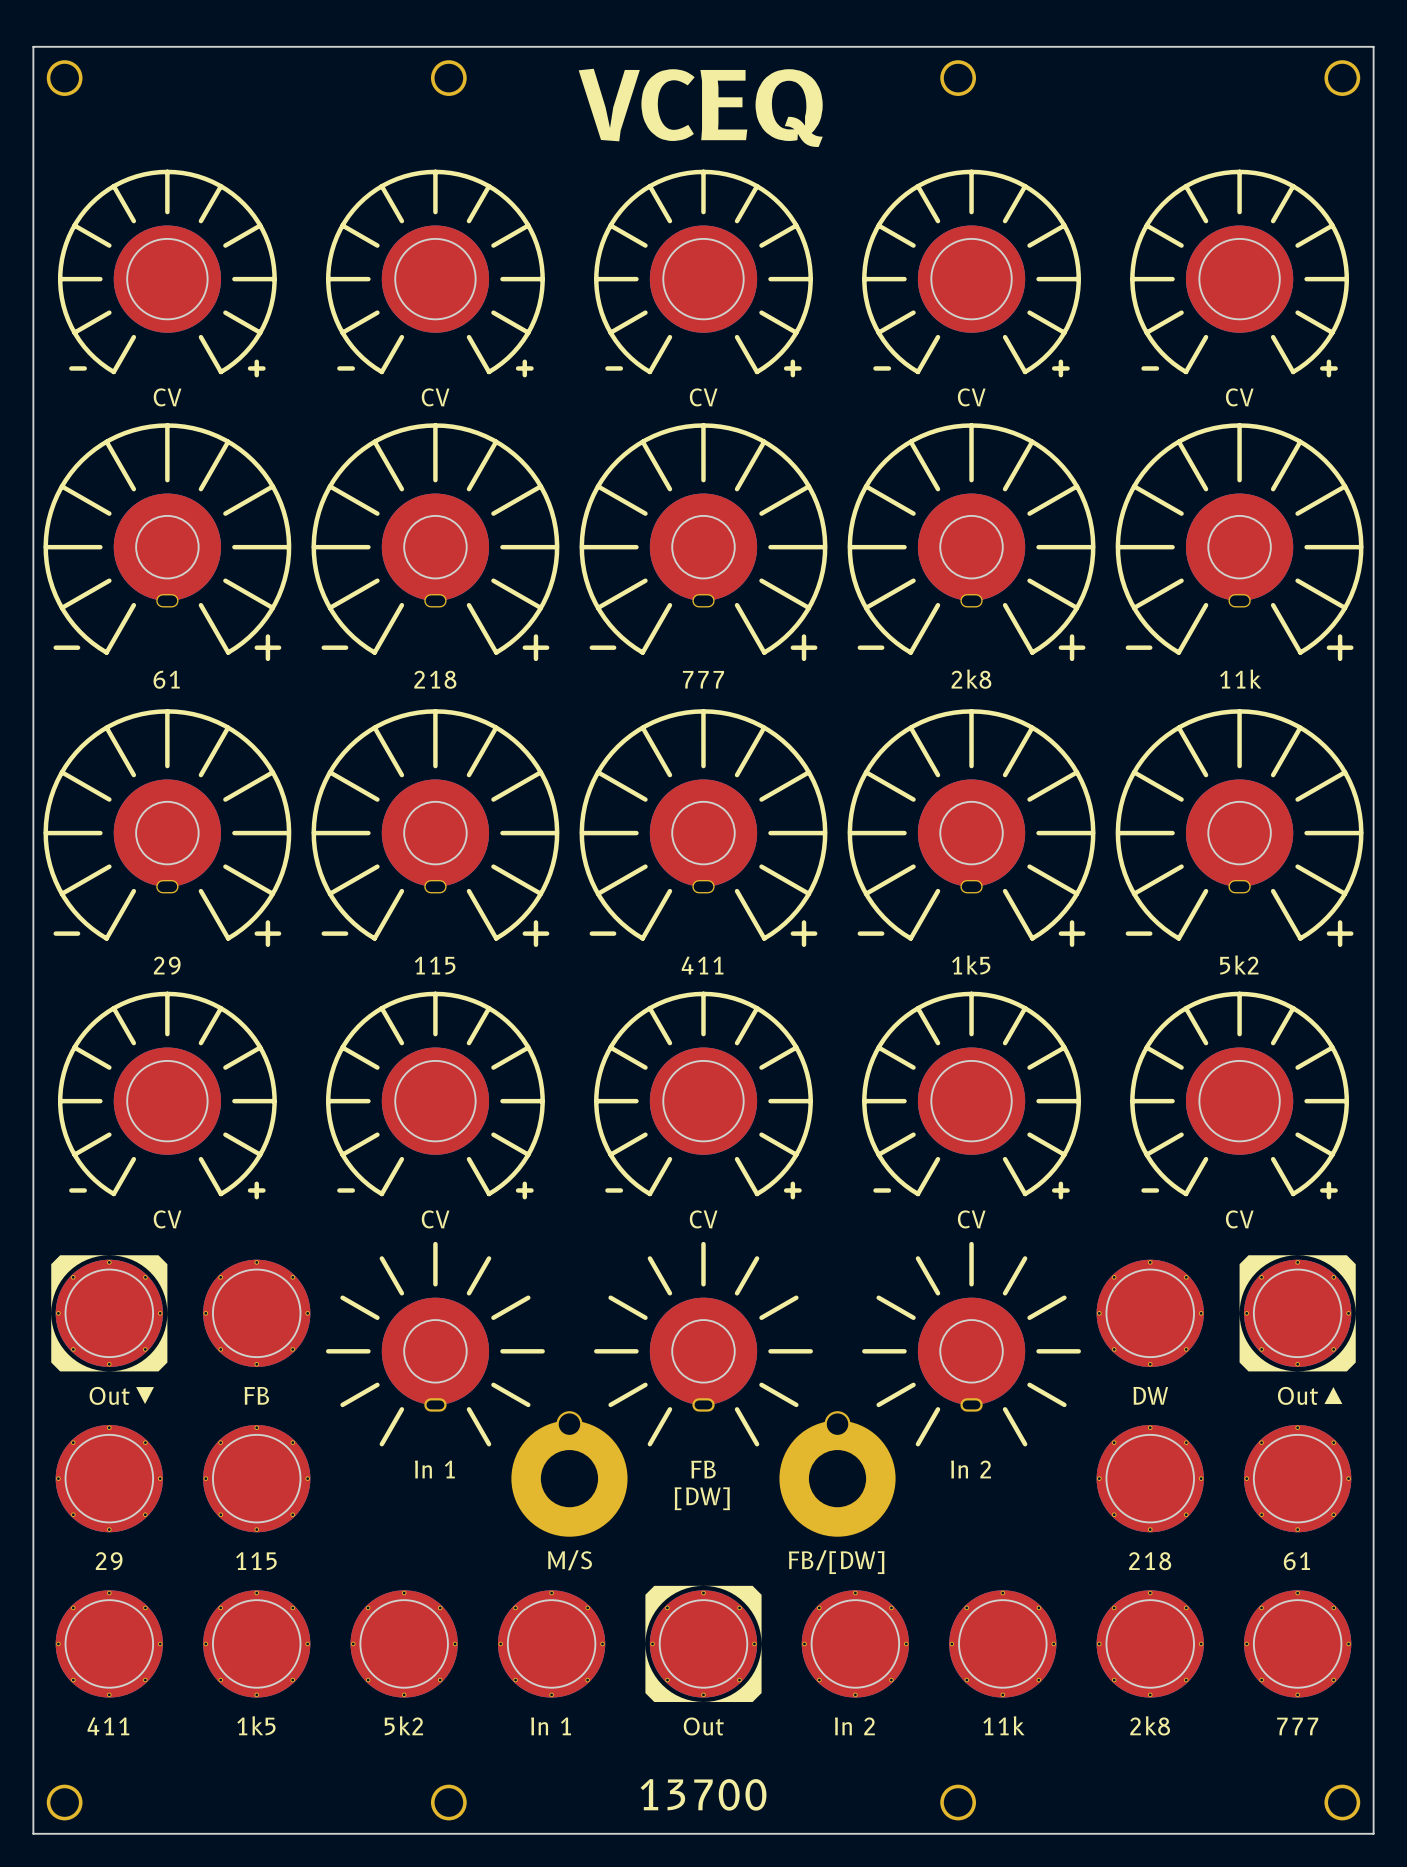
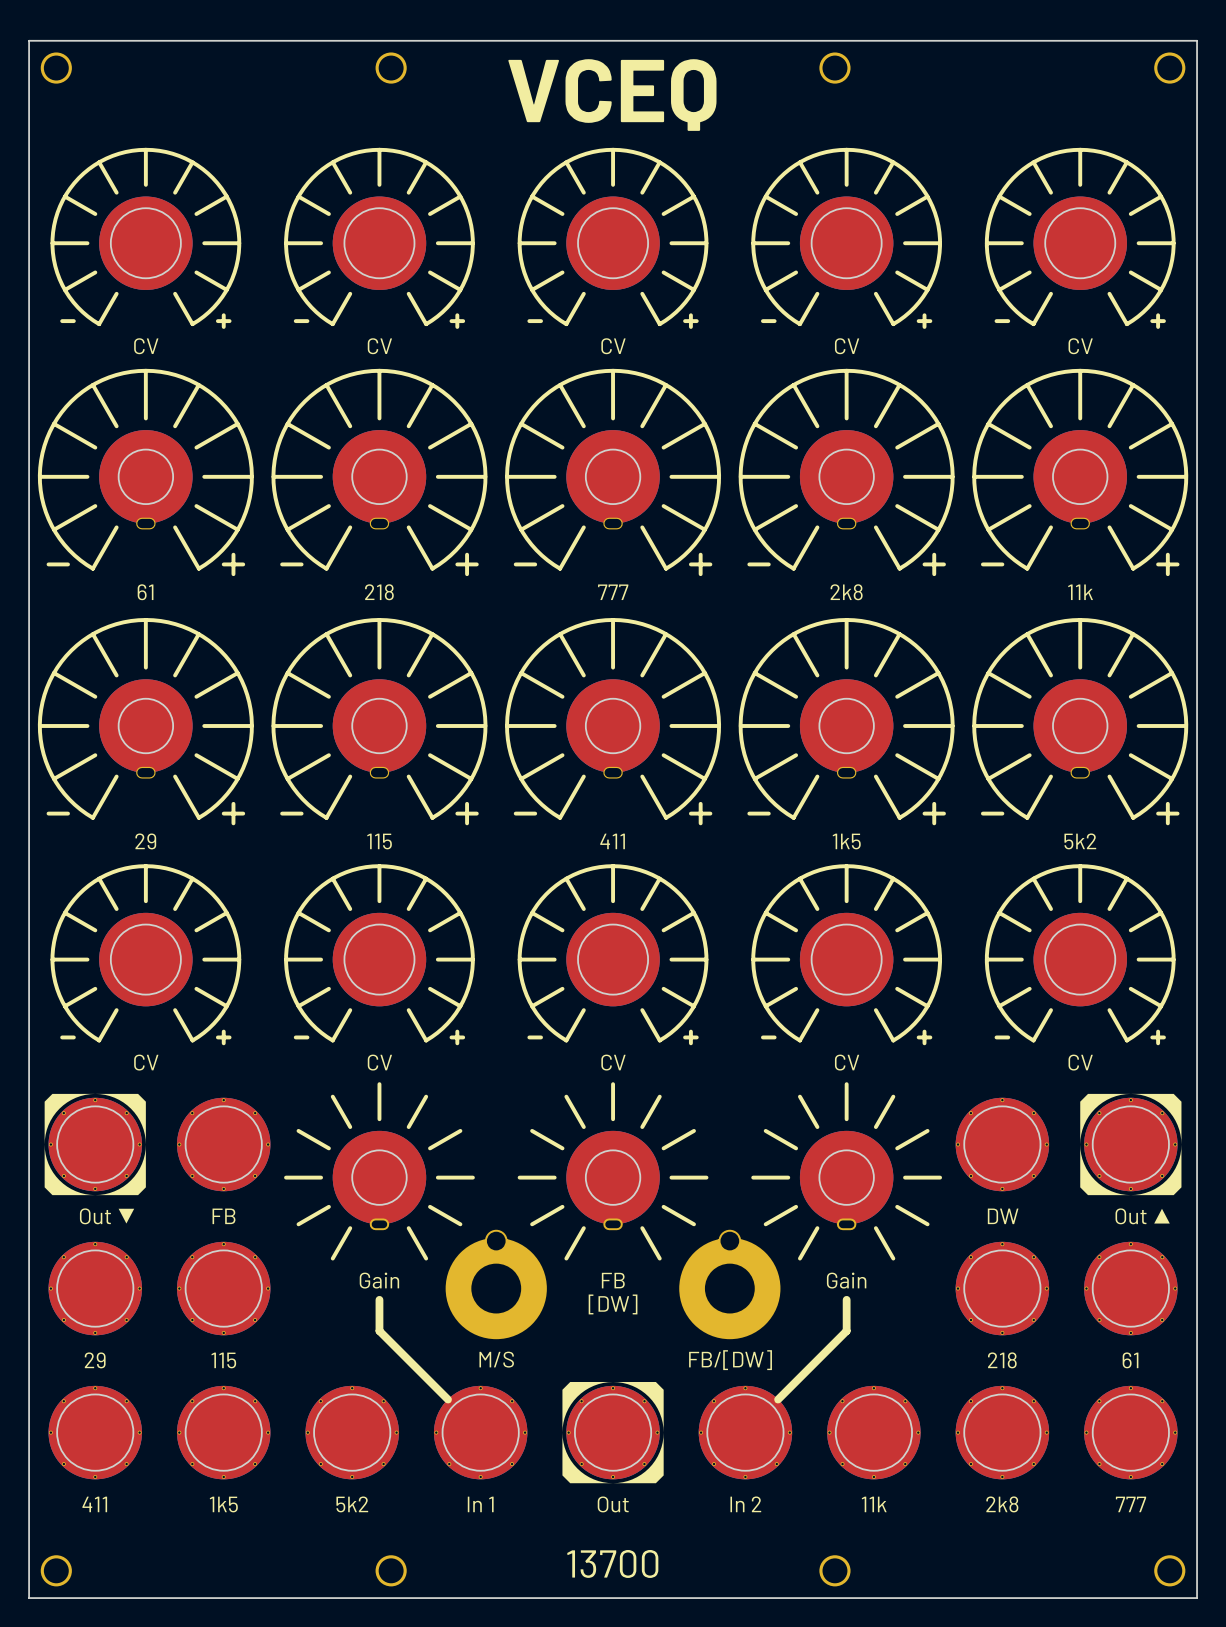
part value: In 1 (434, 1469) -> Gain (379, 1280)
part value: In 2 (971, 1469) -> Gain (846, 1280)
line: none -> (379, 1299) (379, 1331) (447, 1399)
line: none -> (846, 1299) (846, 1331) (778, 1399)

